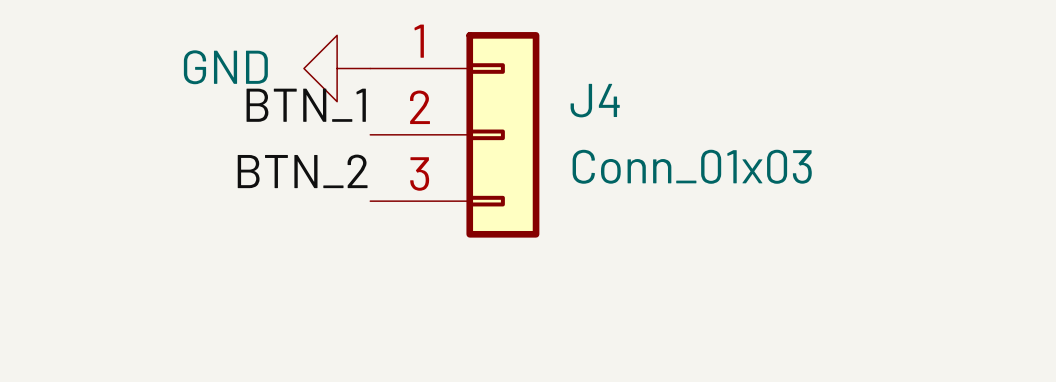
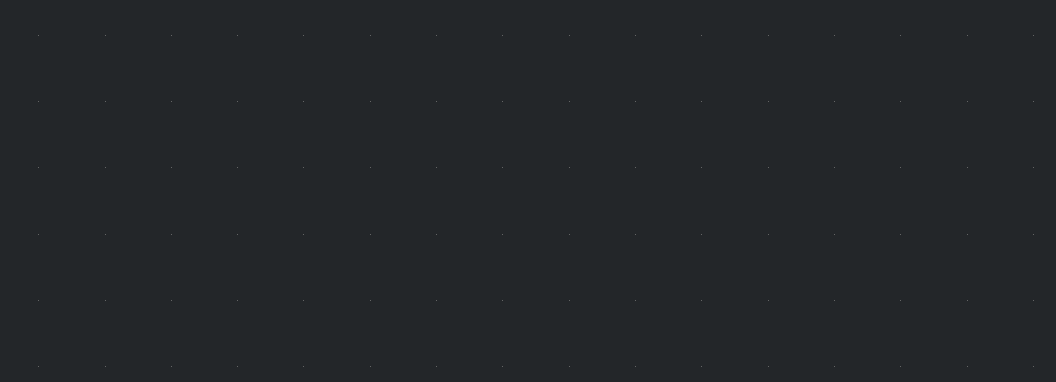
power symbol: GND (337, 68) -> none
label: BTN_1 (306, 105) -> none
J4: Conn_01x03 (454, 134) -> none
label: BTN_2 (302, 171) -> none

